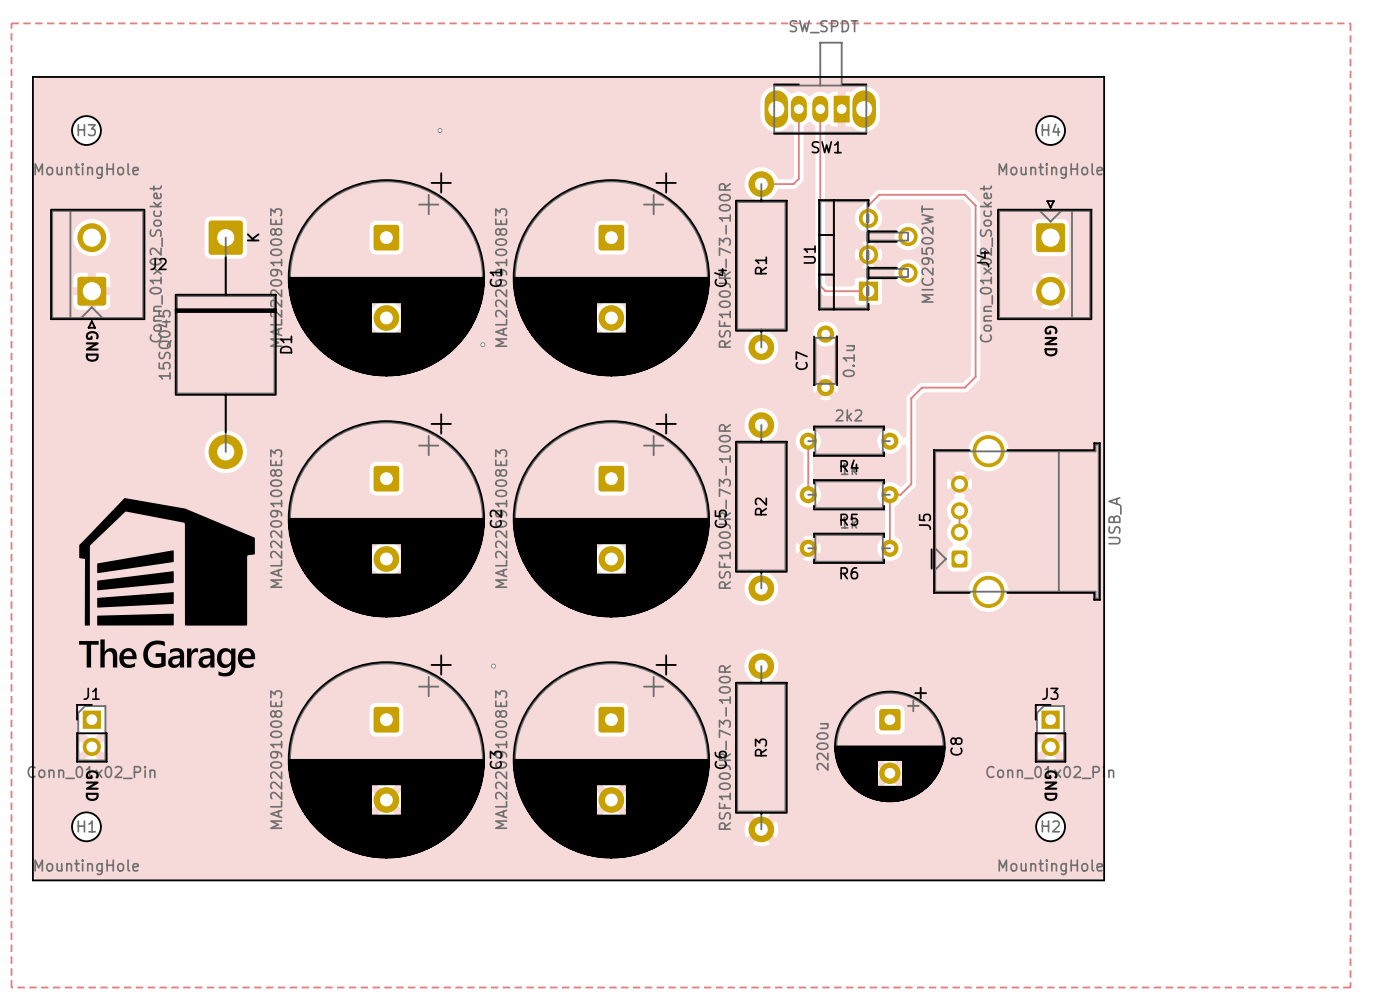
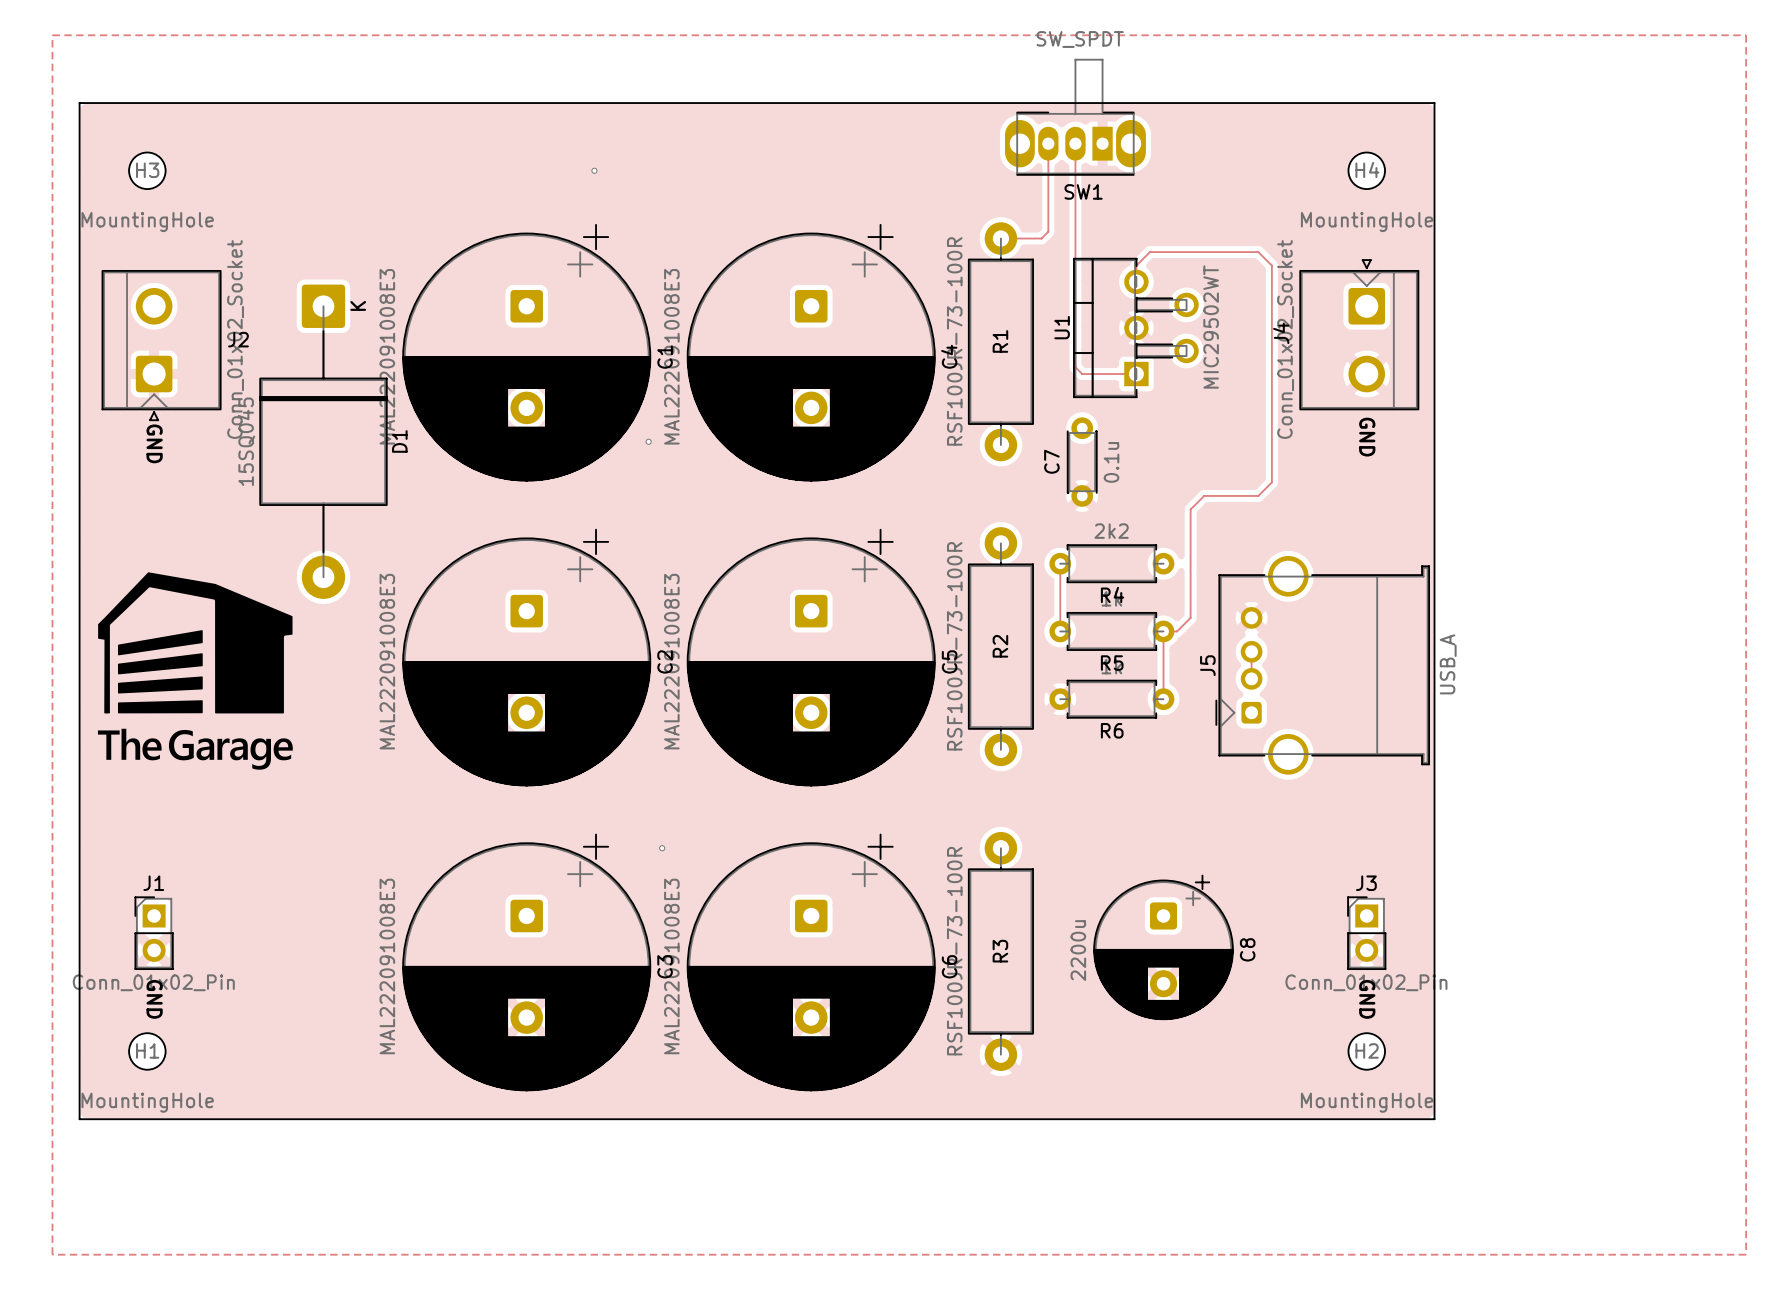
drawing: none -> [97, 572, 293, 770]
drawing: [79, 498, 255, 626] -> none
drawing: [79, 639, 256, 677] -> none

